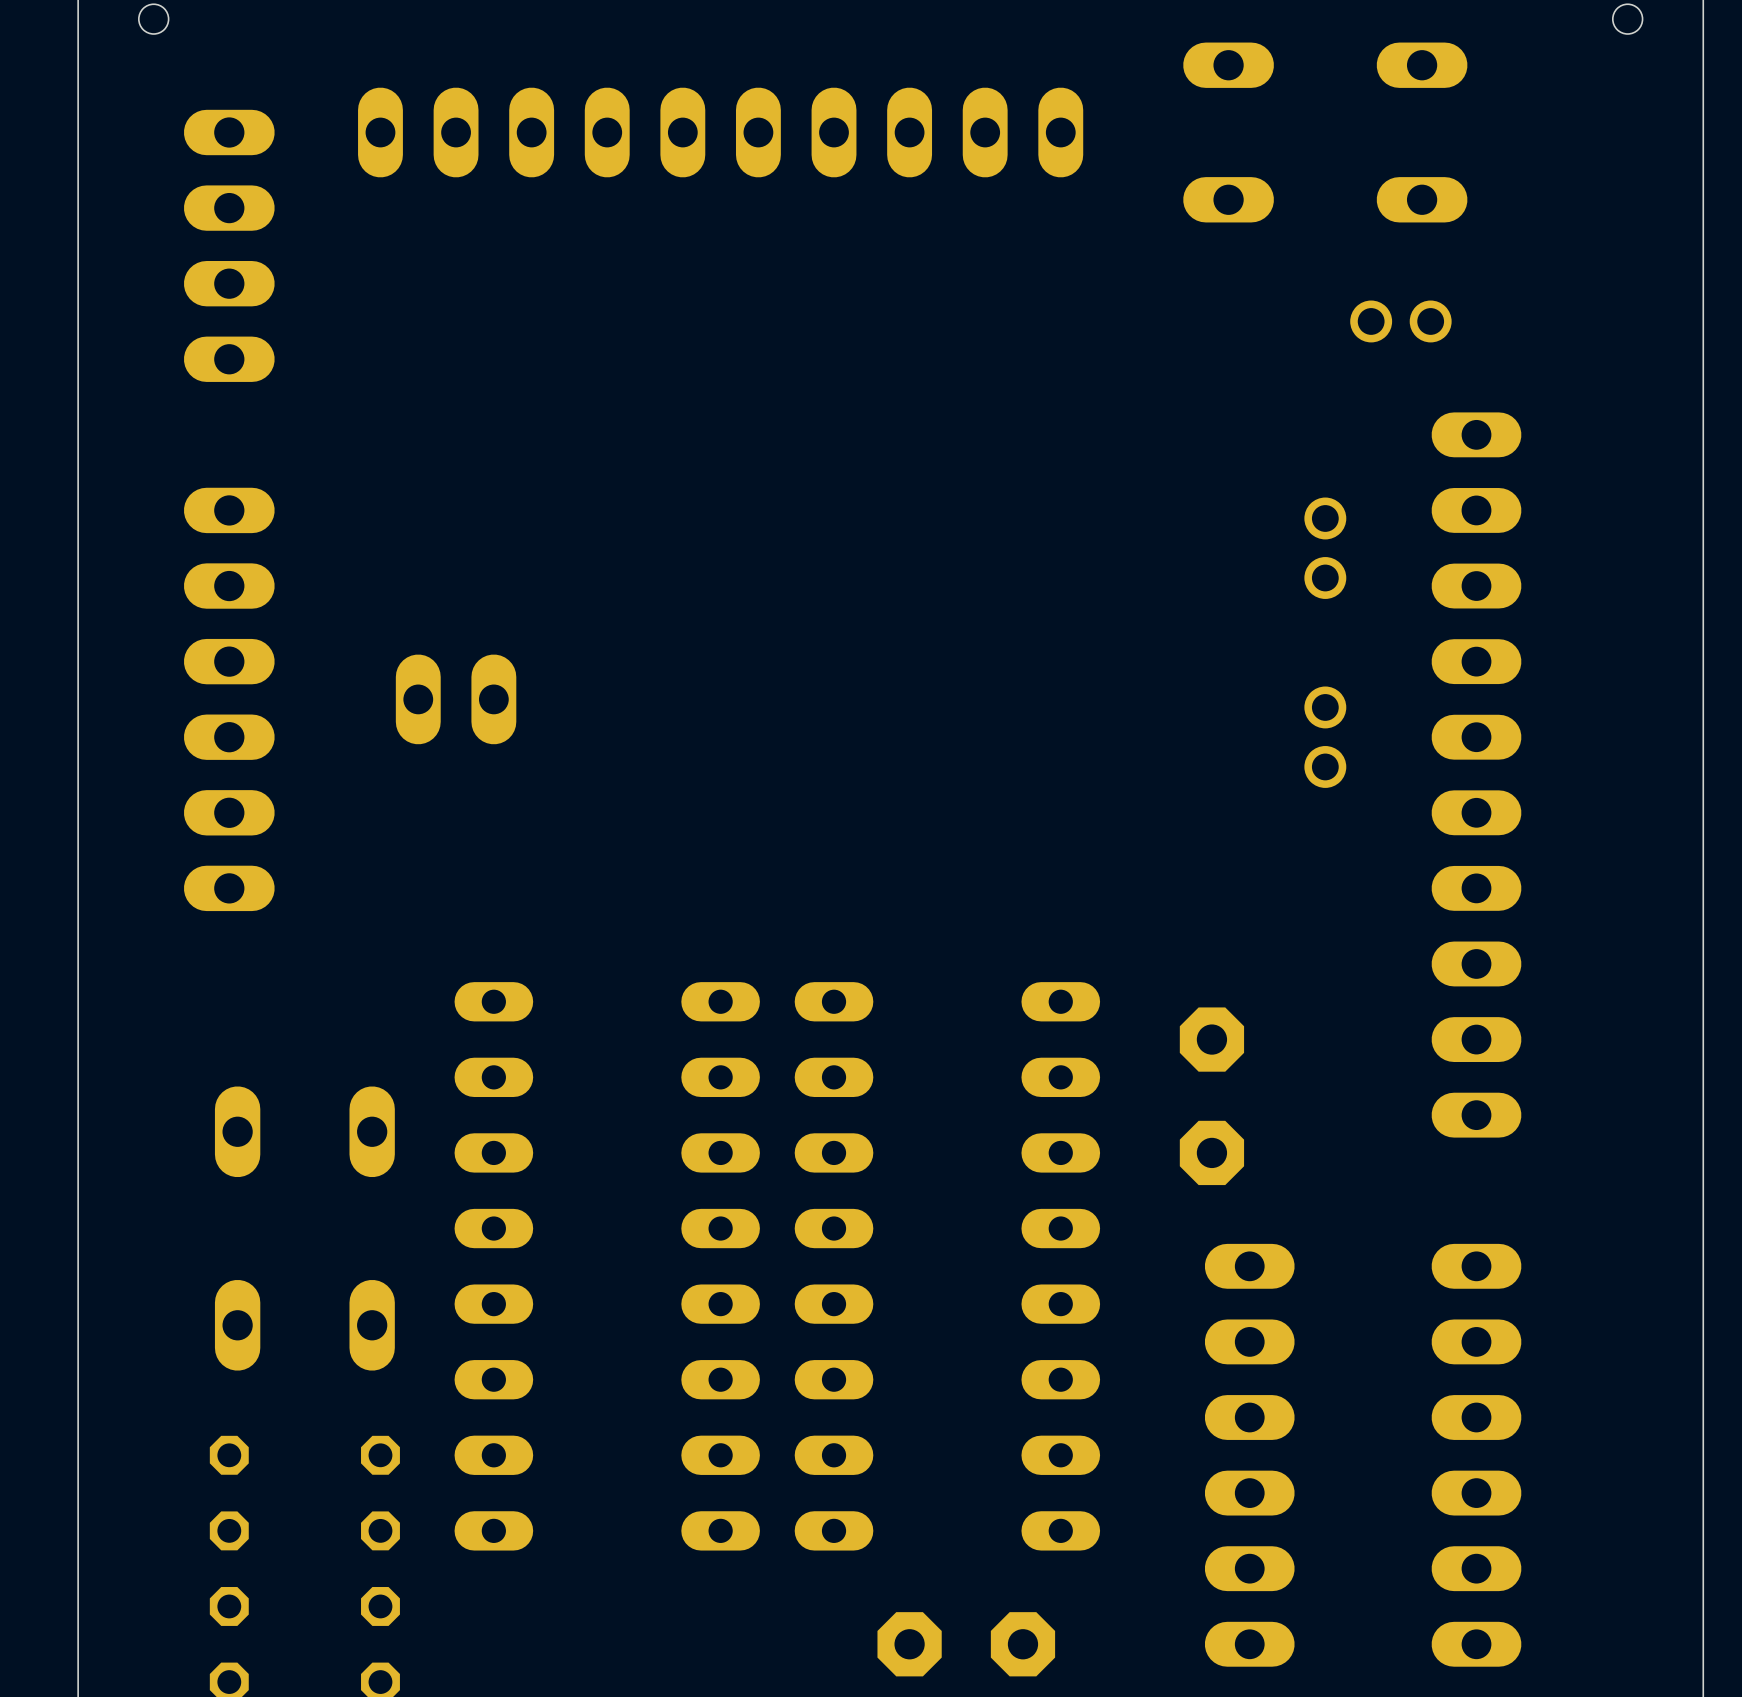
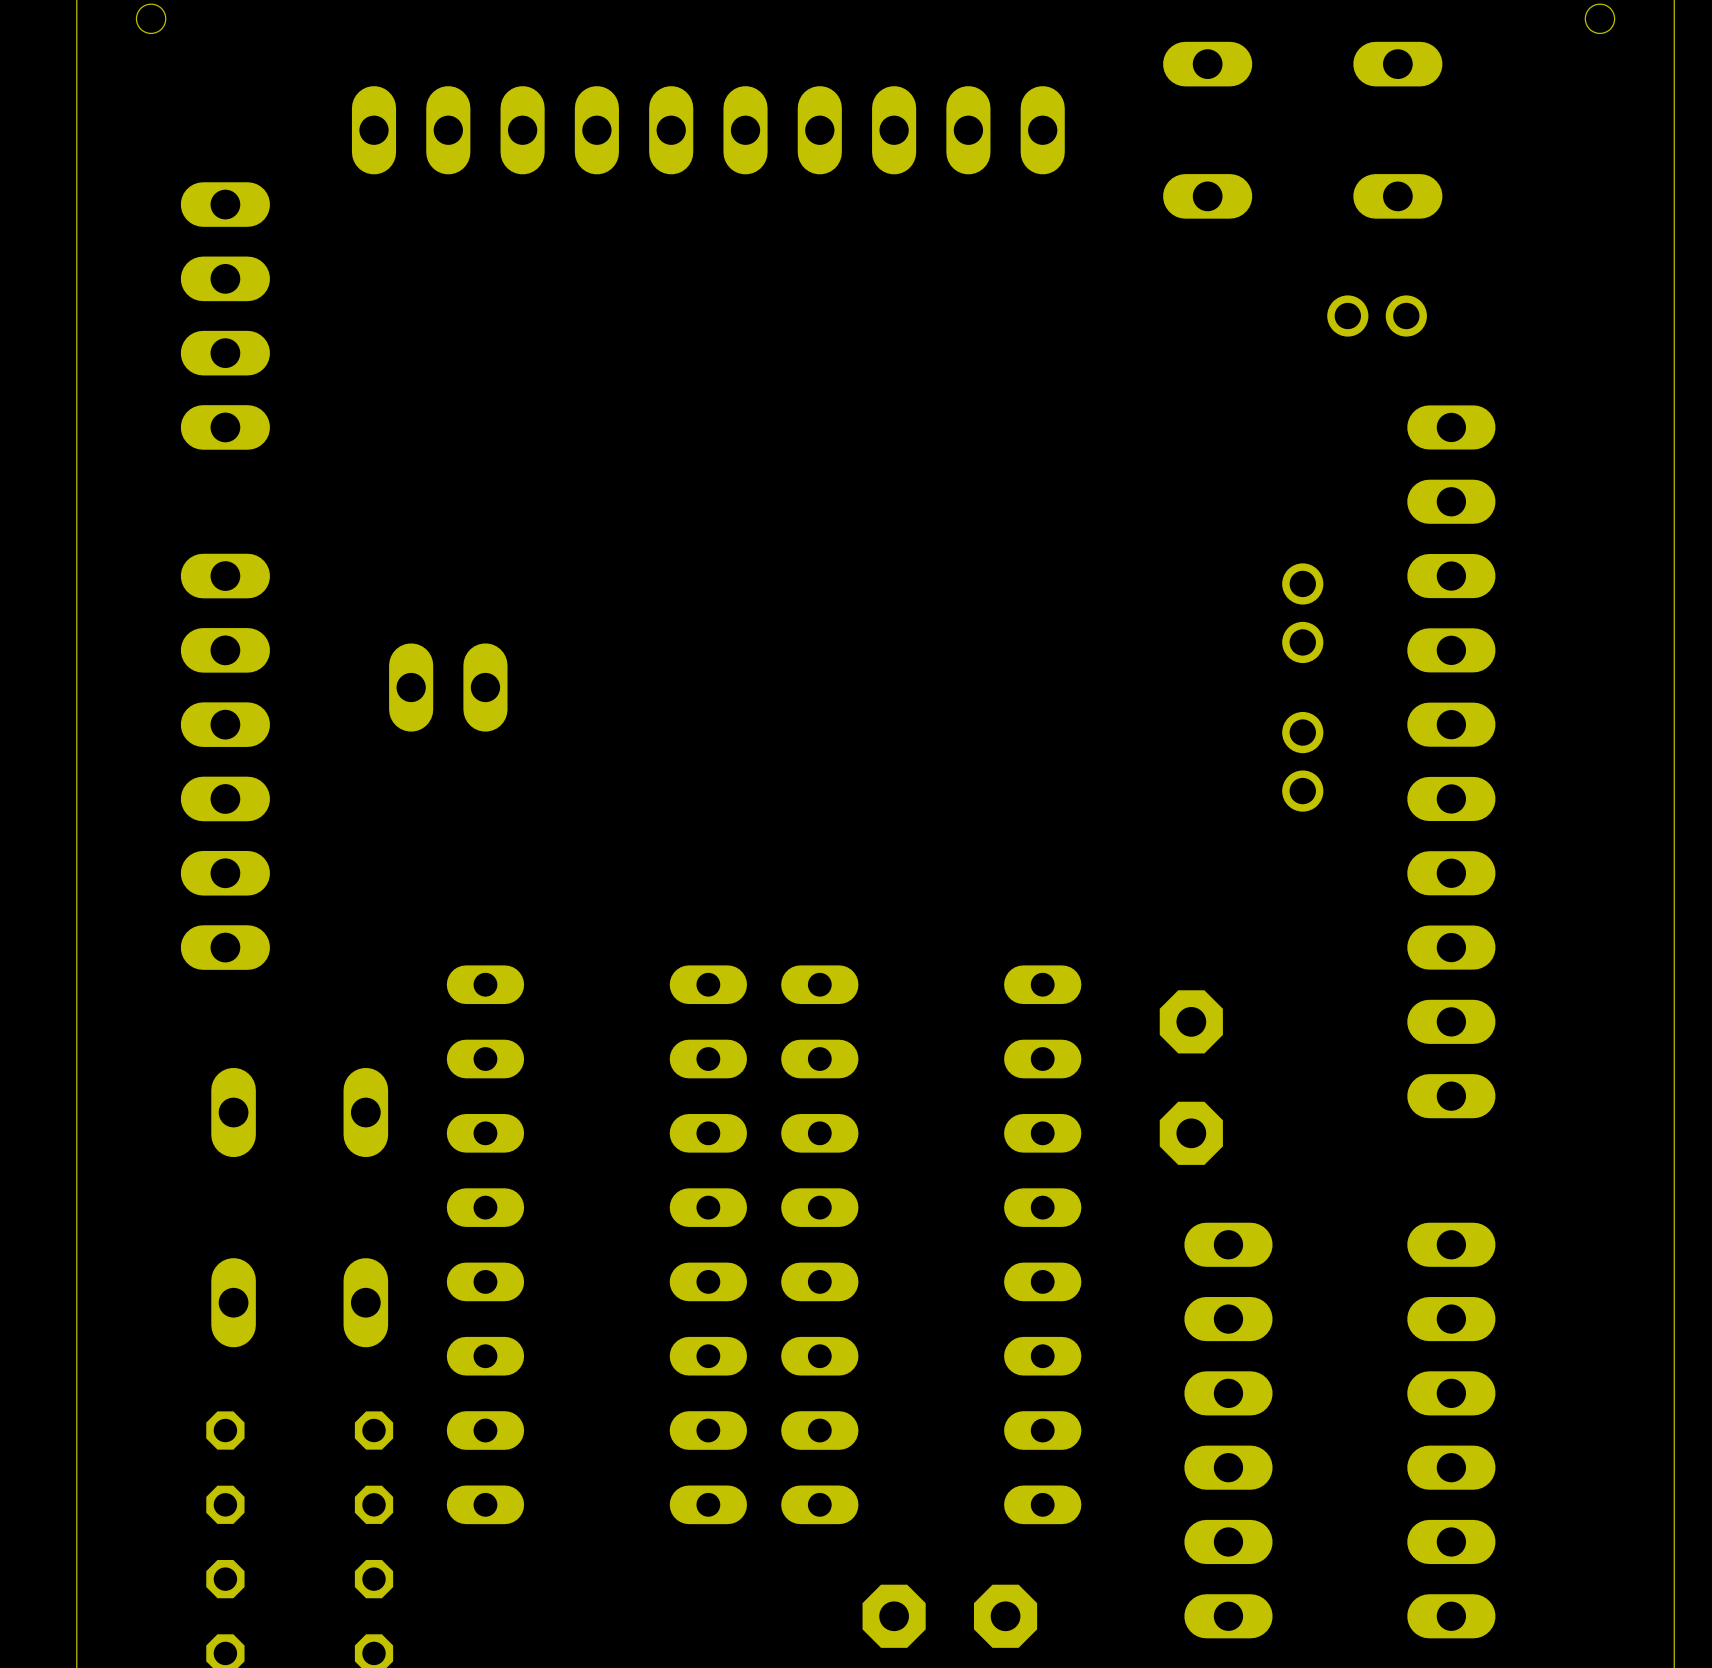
part position: (229, 245) -> (225, 316)
part: (1325, 548) -> none
part: none -> (1302, 613)
part position: (229, 699) -> (225, 761)
part position: (1325, 737) -> (1302, 761)

